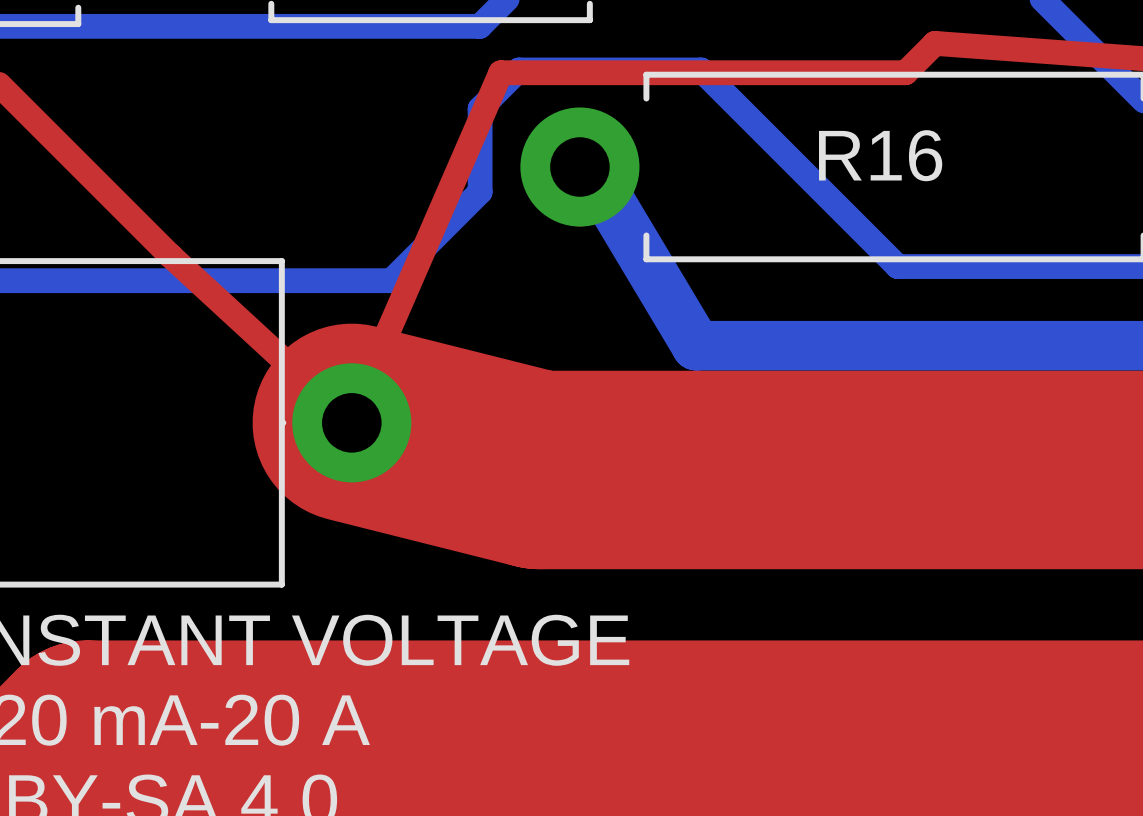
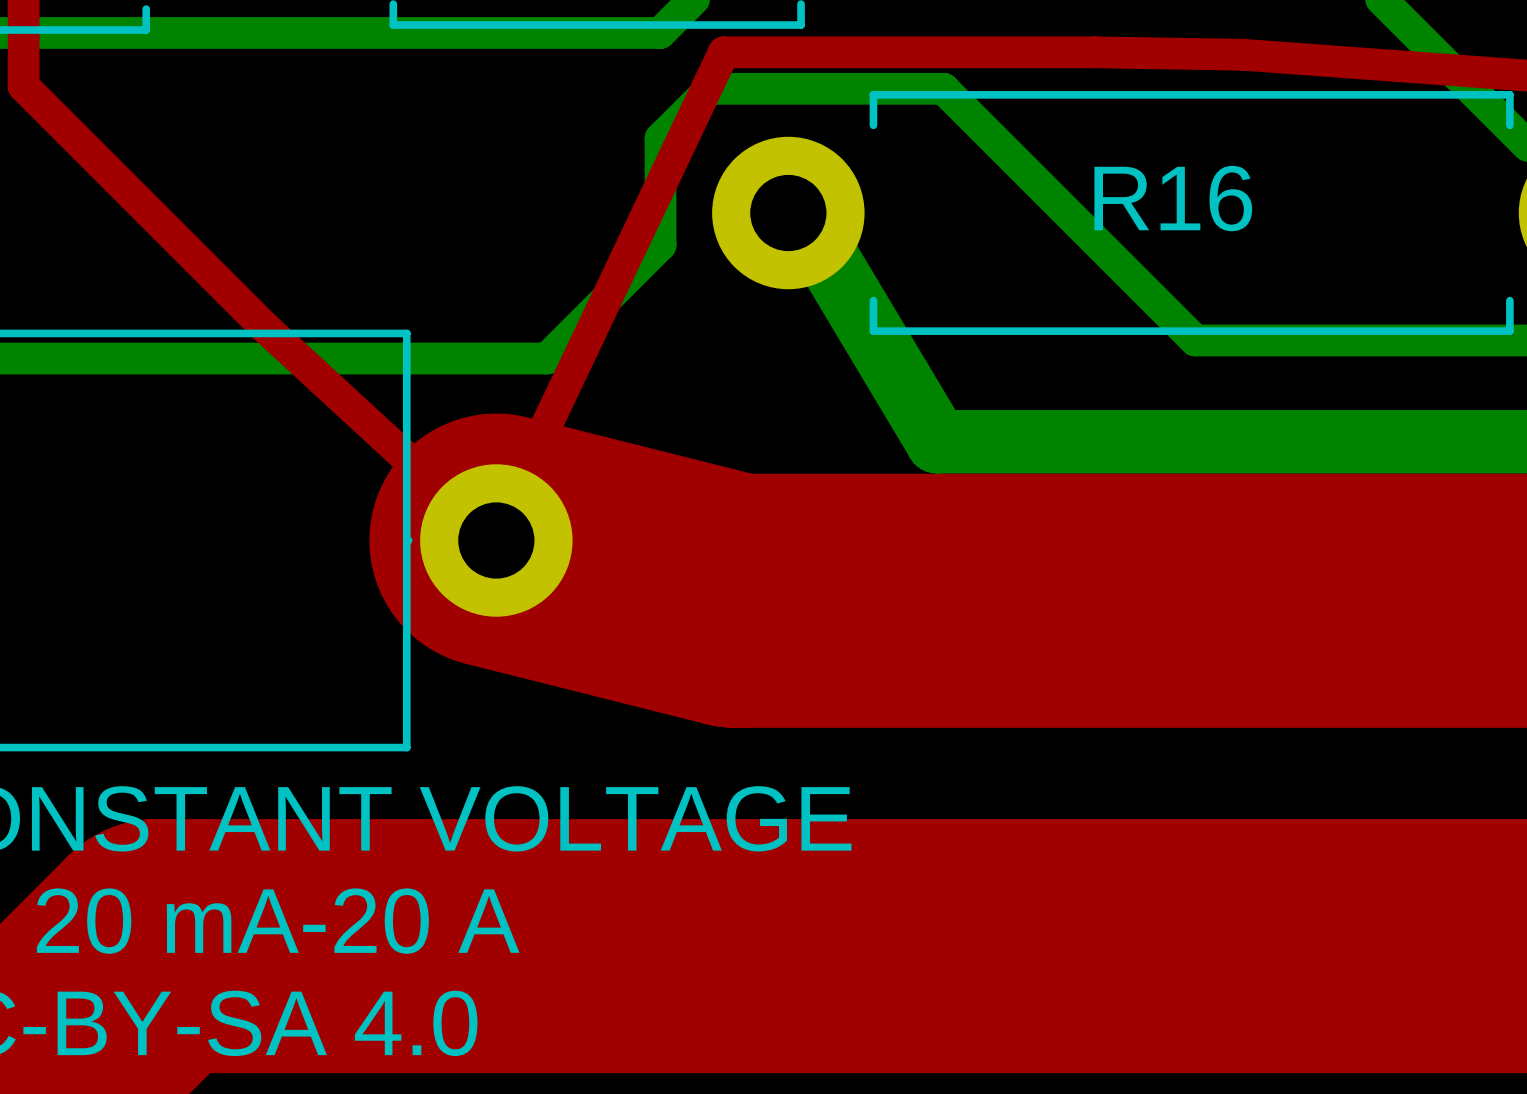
top track: (934, 43) (905, 72) (500, 72) (351, 415) -> (1242, 54) (1094, 52) (723, 52) (496, 530)

